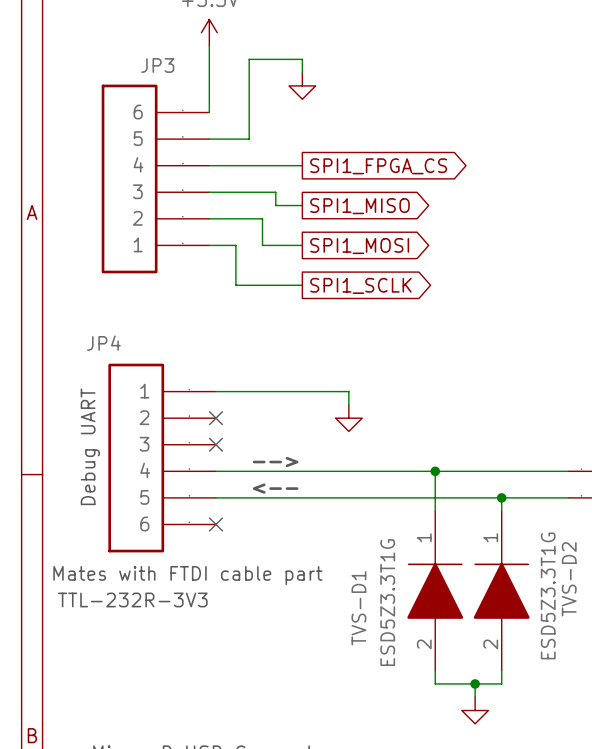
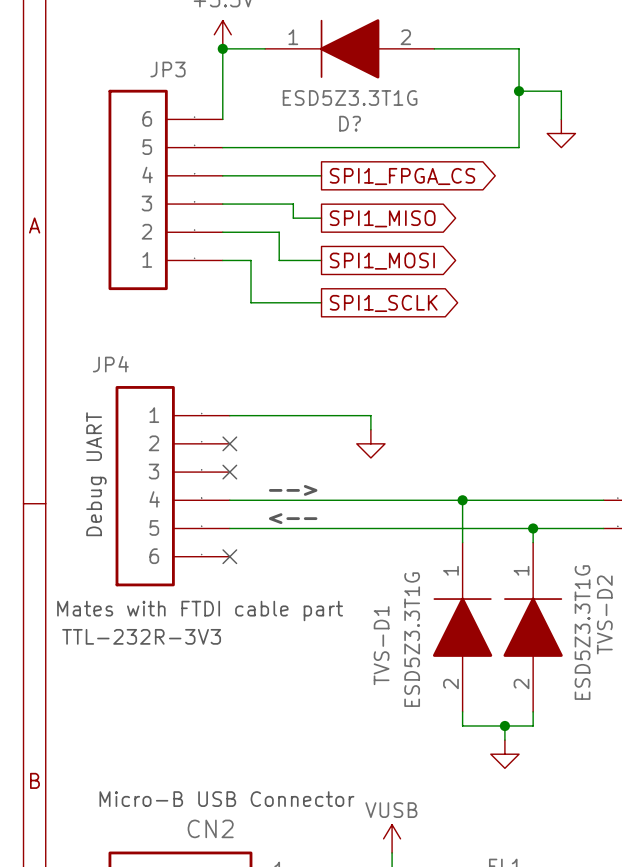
wire: none -> (222, 48) (265, 48)
junction: none -> (222, 48)
D?: none -> ESD5Z3.3T1G (349, 48)
wire: (302, 72) (302, 59) (249, 59) (249, 139) -> (434, 48) (519, 48) (519, 147) (265, 147)
power symbol: (302, 85) -> none
wire: none -> (519, 91) (561, 91) (561, 119)
junction: none -> (519, 91)
power symbol: none -> (561, 133)

